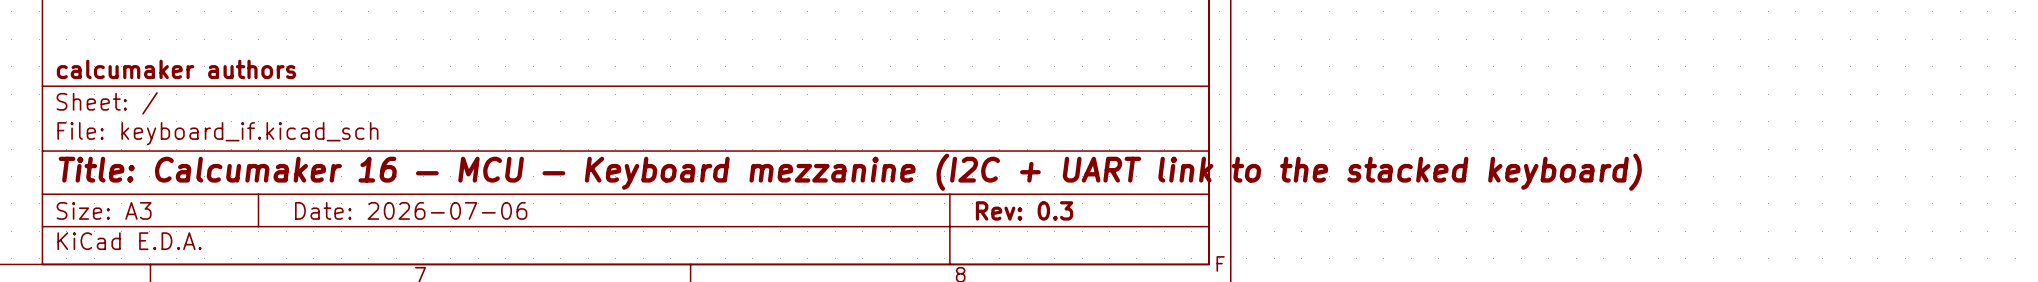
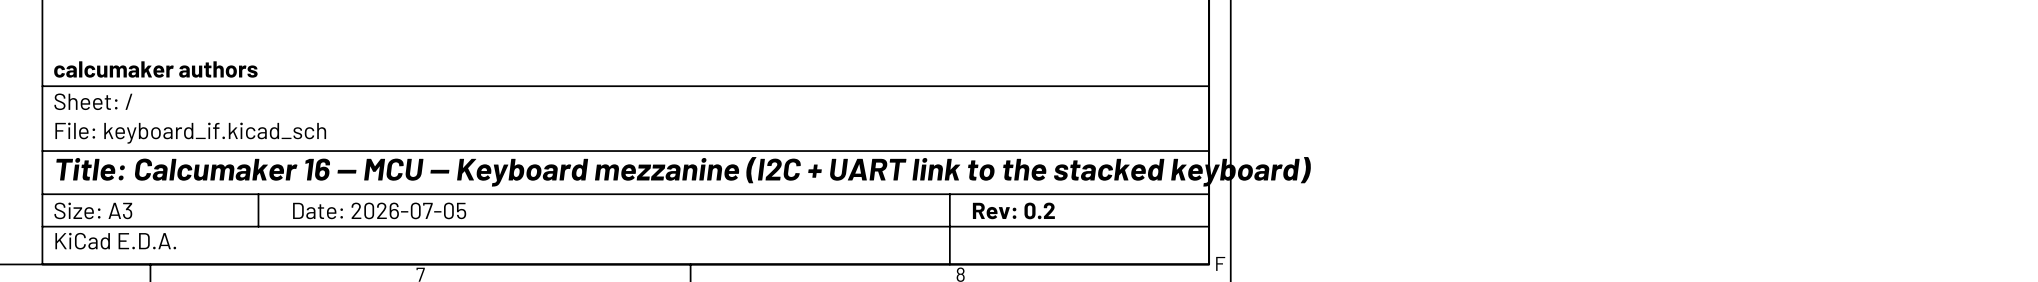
title block: Date: 2026-07-06 (411, 210) -> Date: 2026-07-05 (379, 210)
title block: Rev: 0.3 (1024, 210) -> Rev: 0.2 (1013, 210)

